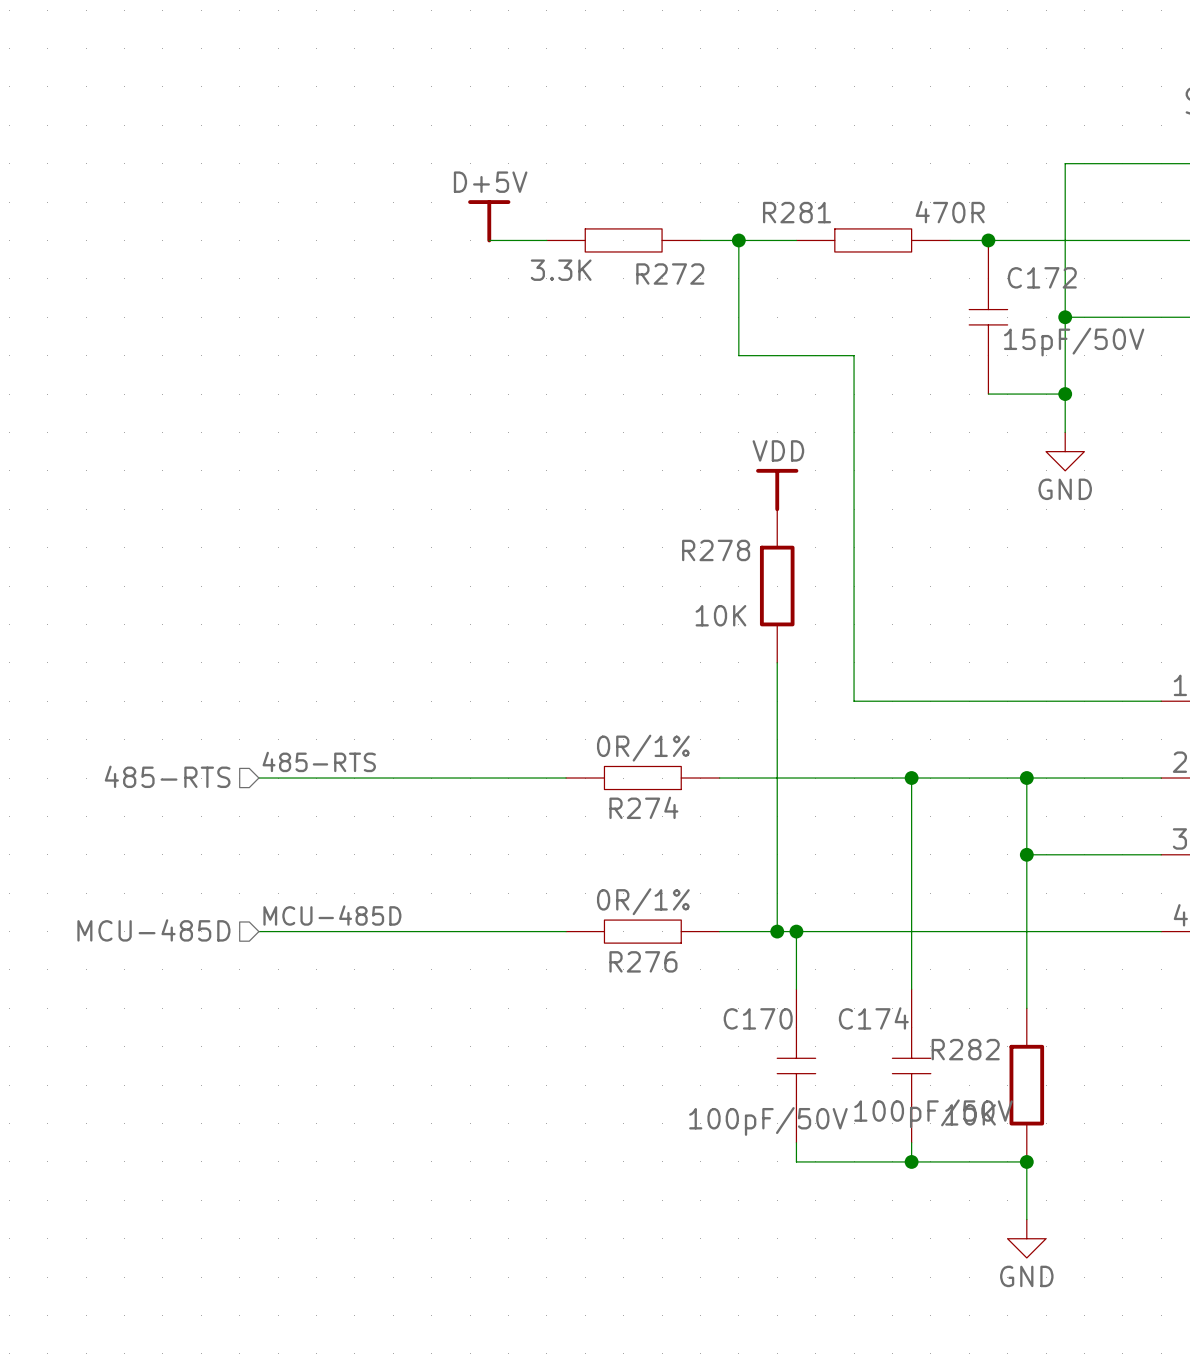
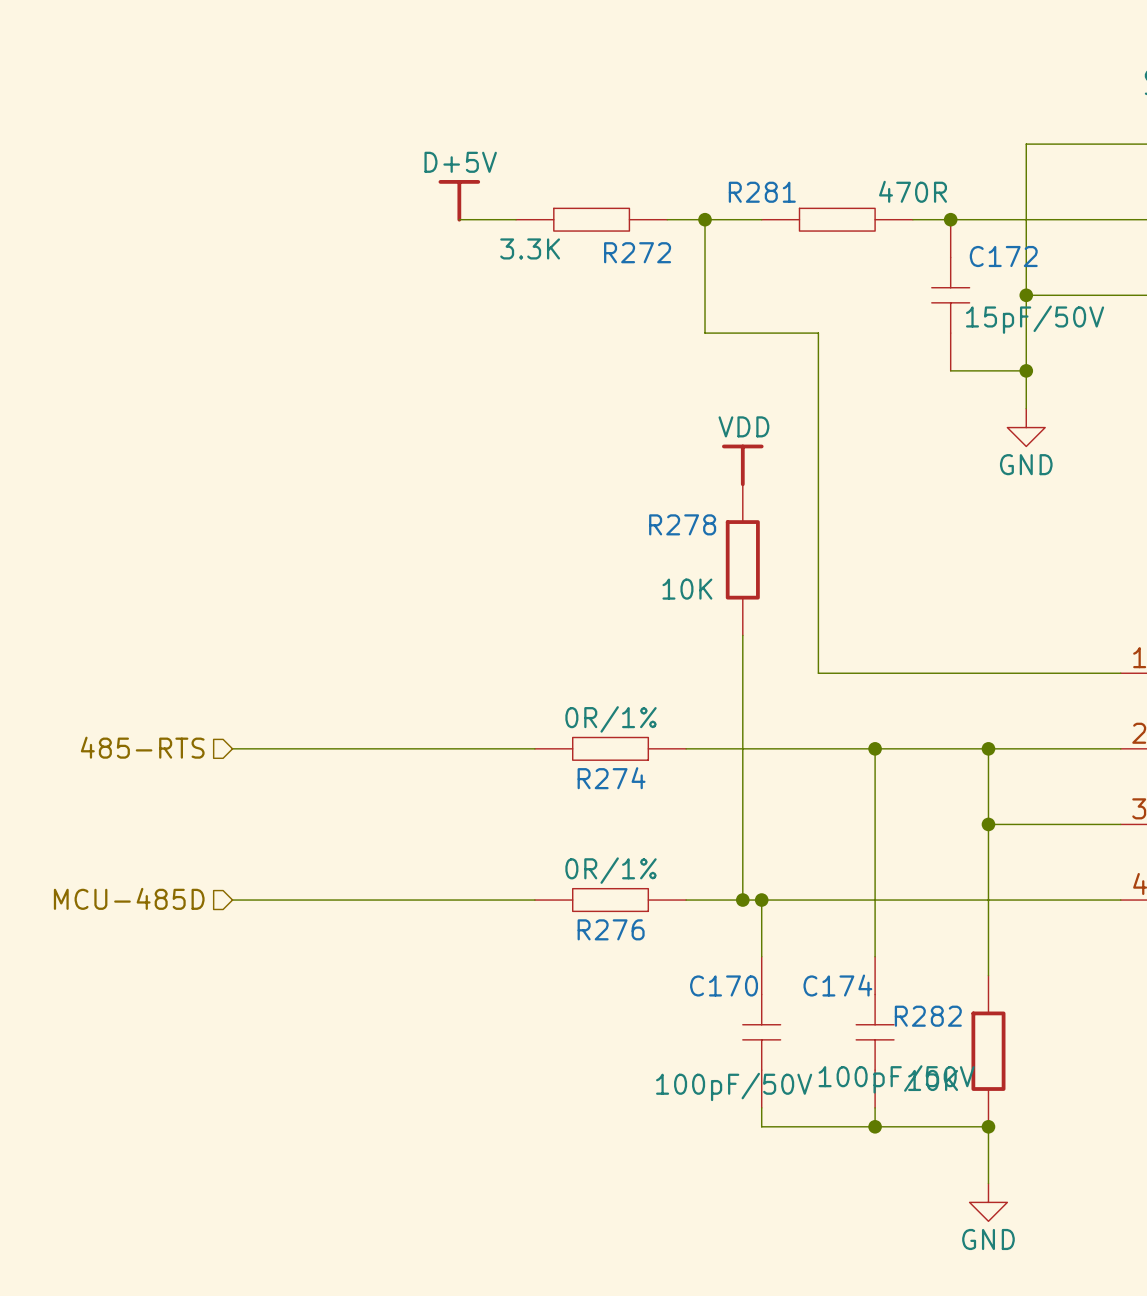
label: 485-RTS (319, 761) -> none
label: MCU-485D (332, 915) -> none

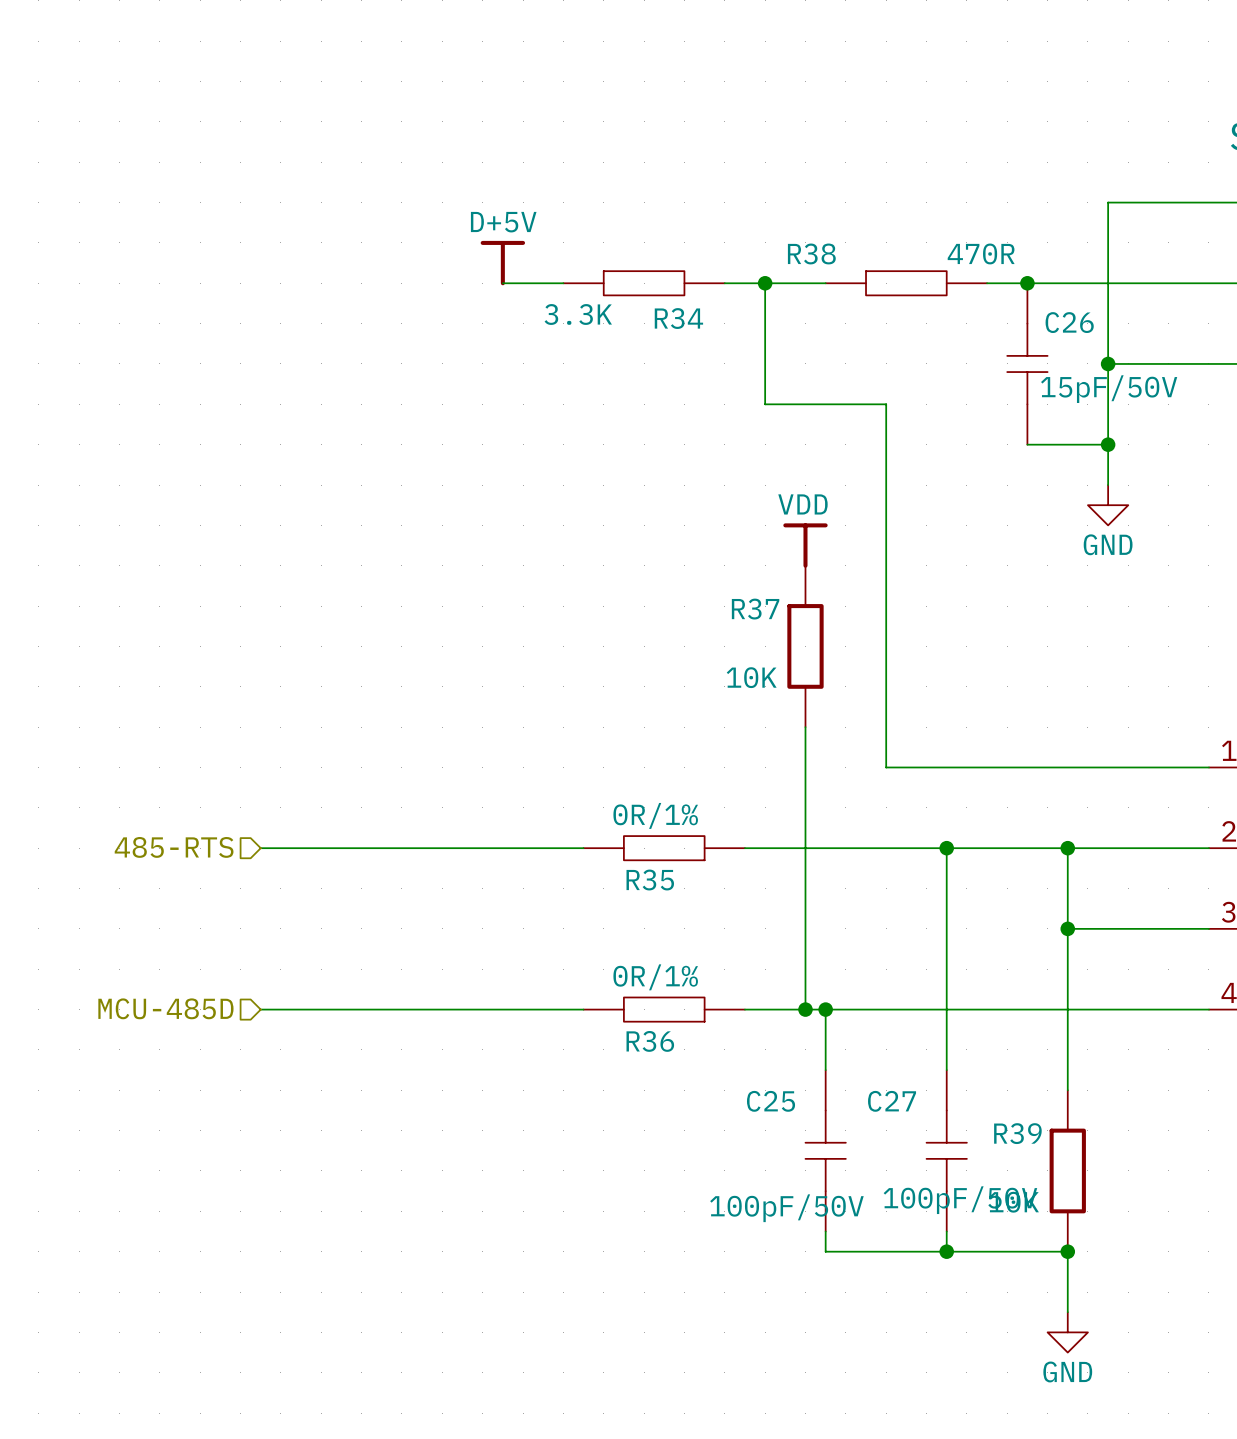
R281 name: R281 (762, 192) -> R38 (811, 253)
R272 name: R272 (637, 252) -> R34 (678, 318)
C172 name: C172 (1003, 256) -> C26 (1069, 322)
R278 name: R278 (682, 524) -> R37 (755, 609)
R274 name: R274 (611, 778) -> R35 (650, 880)
R276 name: R276 (611, 929) -> R36 (650, 1041)
C170 name: C170 (724, 985) -> C25 (771, 1101)
C174 name: C174 (837, 985) -> C27 (892, 1101)
R282 name: R282 (928, 1016) -> R39 (1017, 1133)

